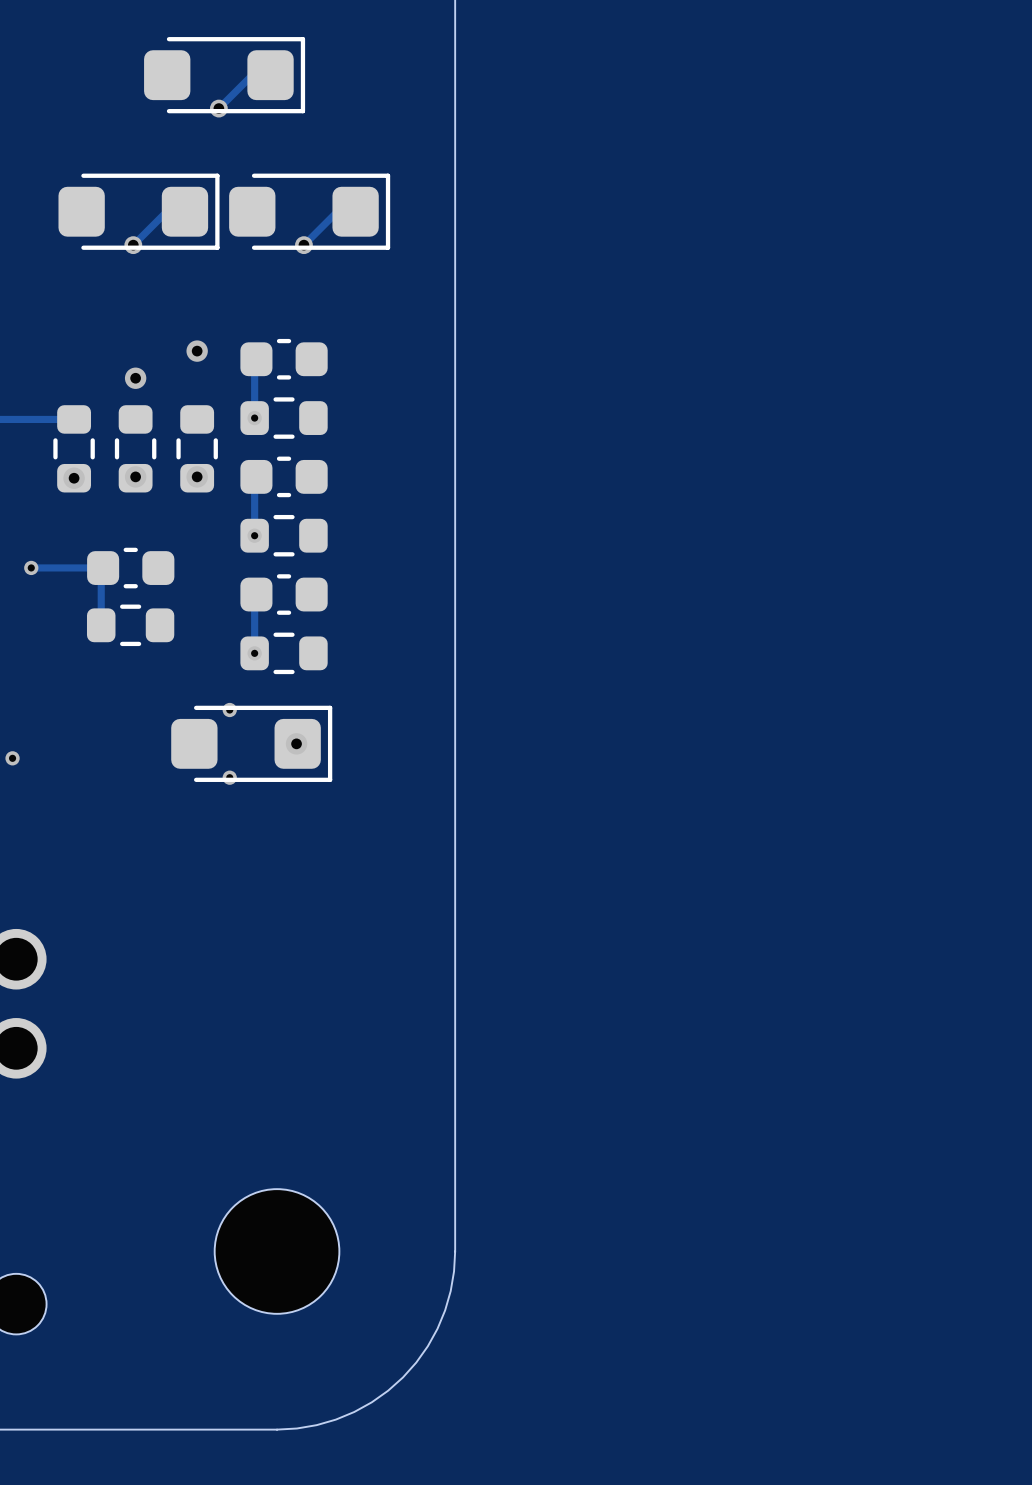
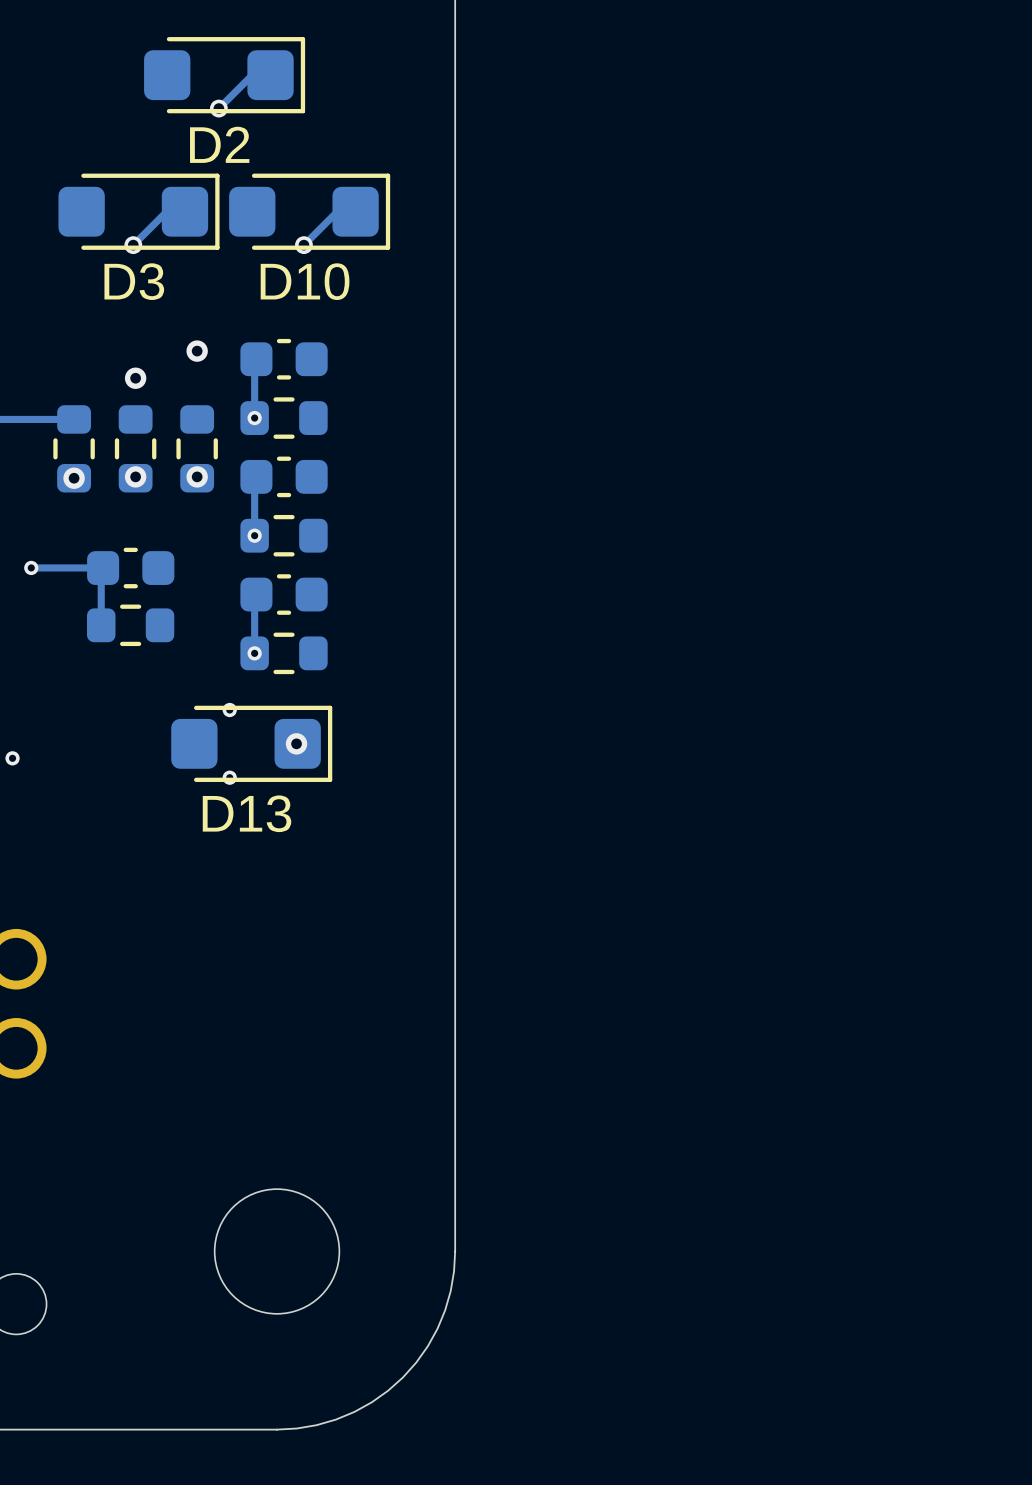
D2 name: none -> D2 (219, 144)
D3 name: none -> D3 (134, 281)
D10 name: none -> D10 (305, 281)
D13 name: none -> D13 (247, 813)

